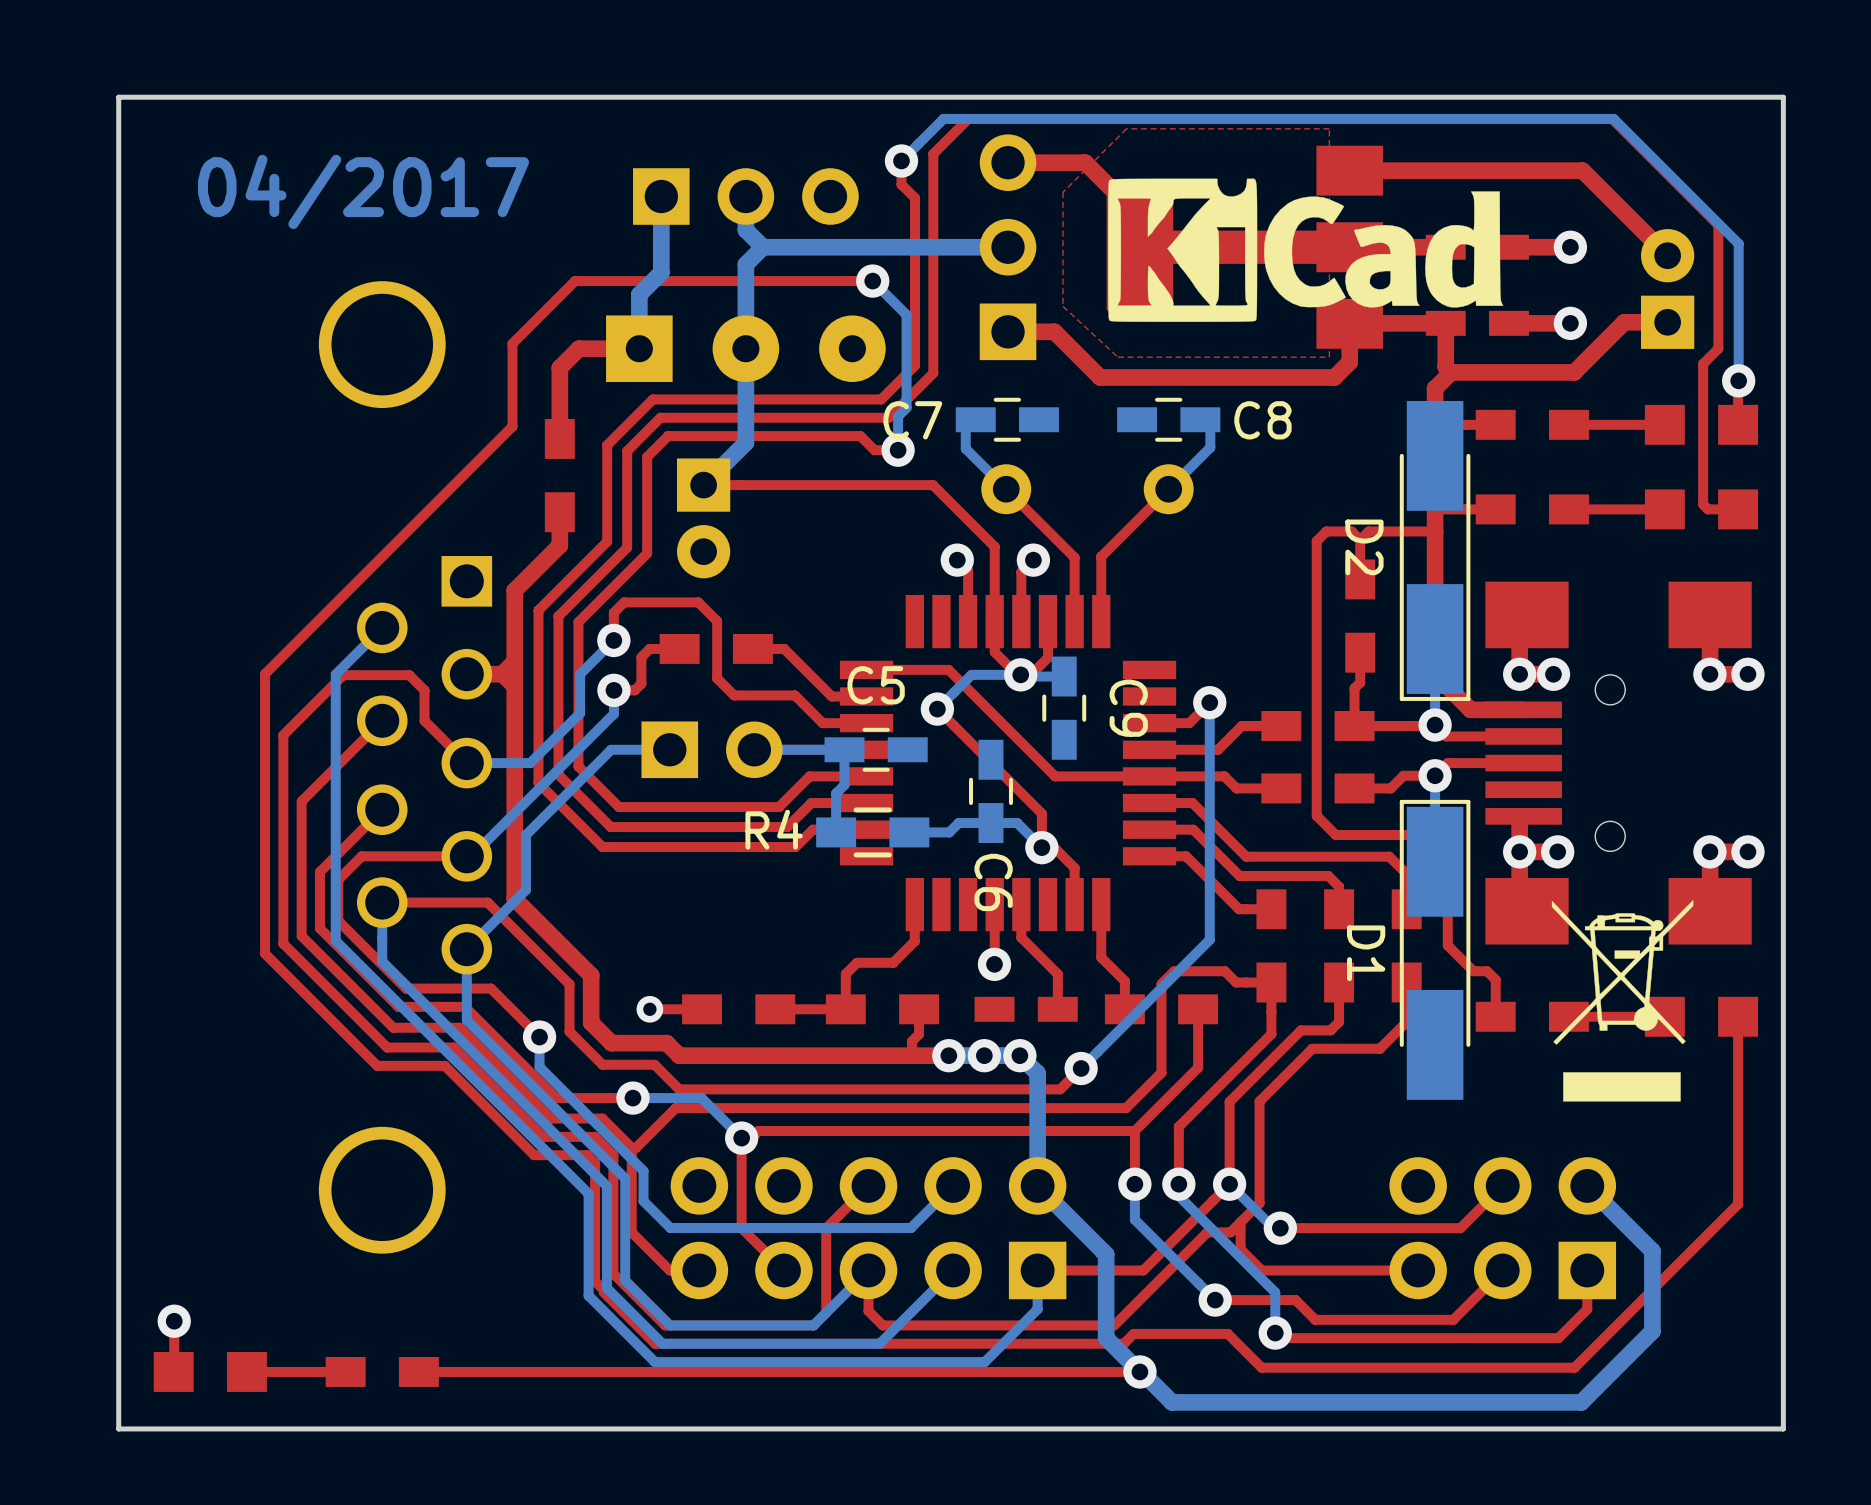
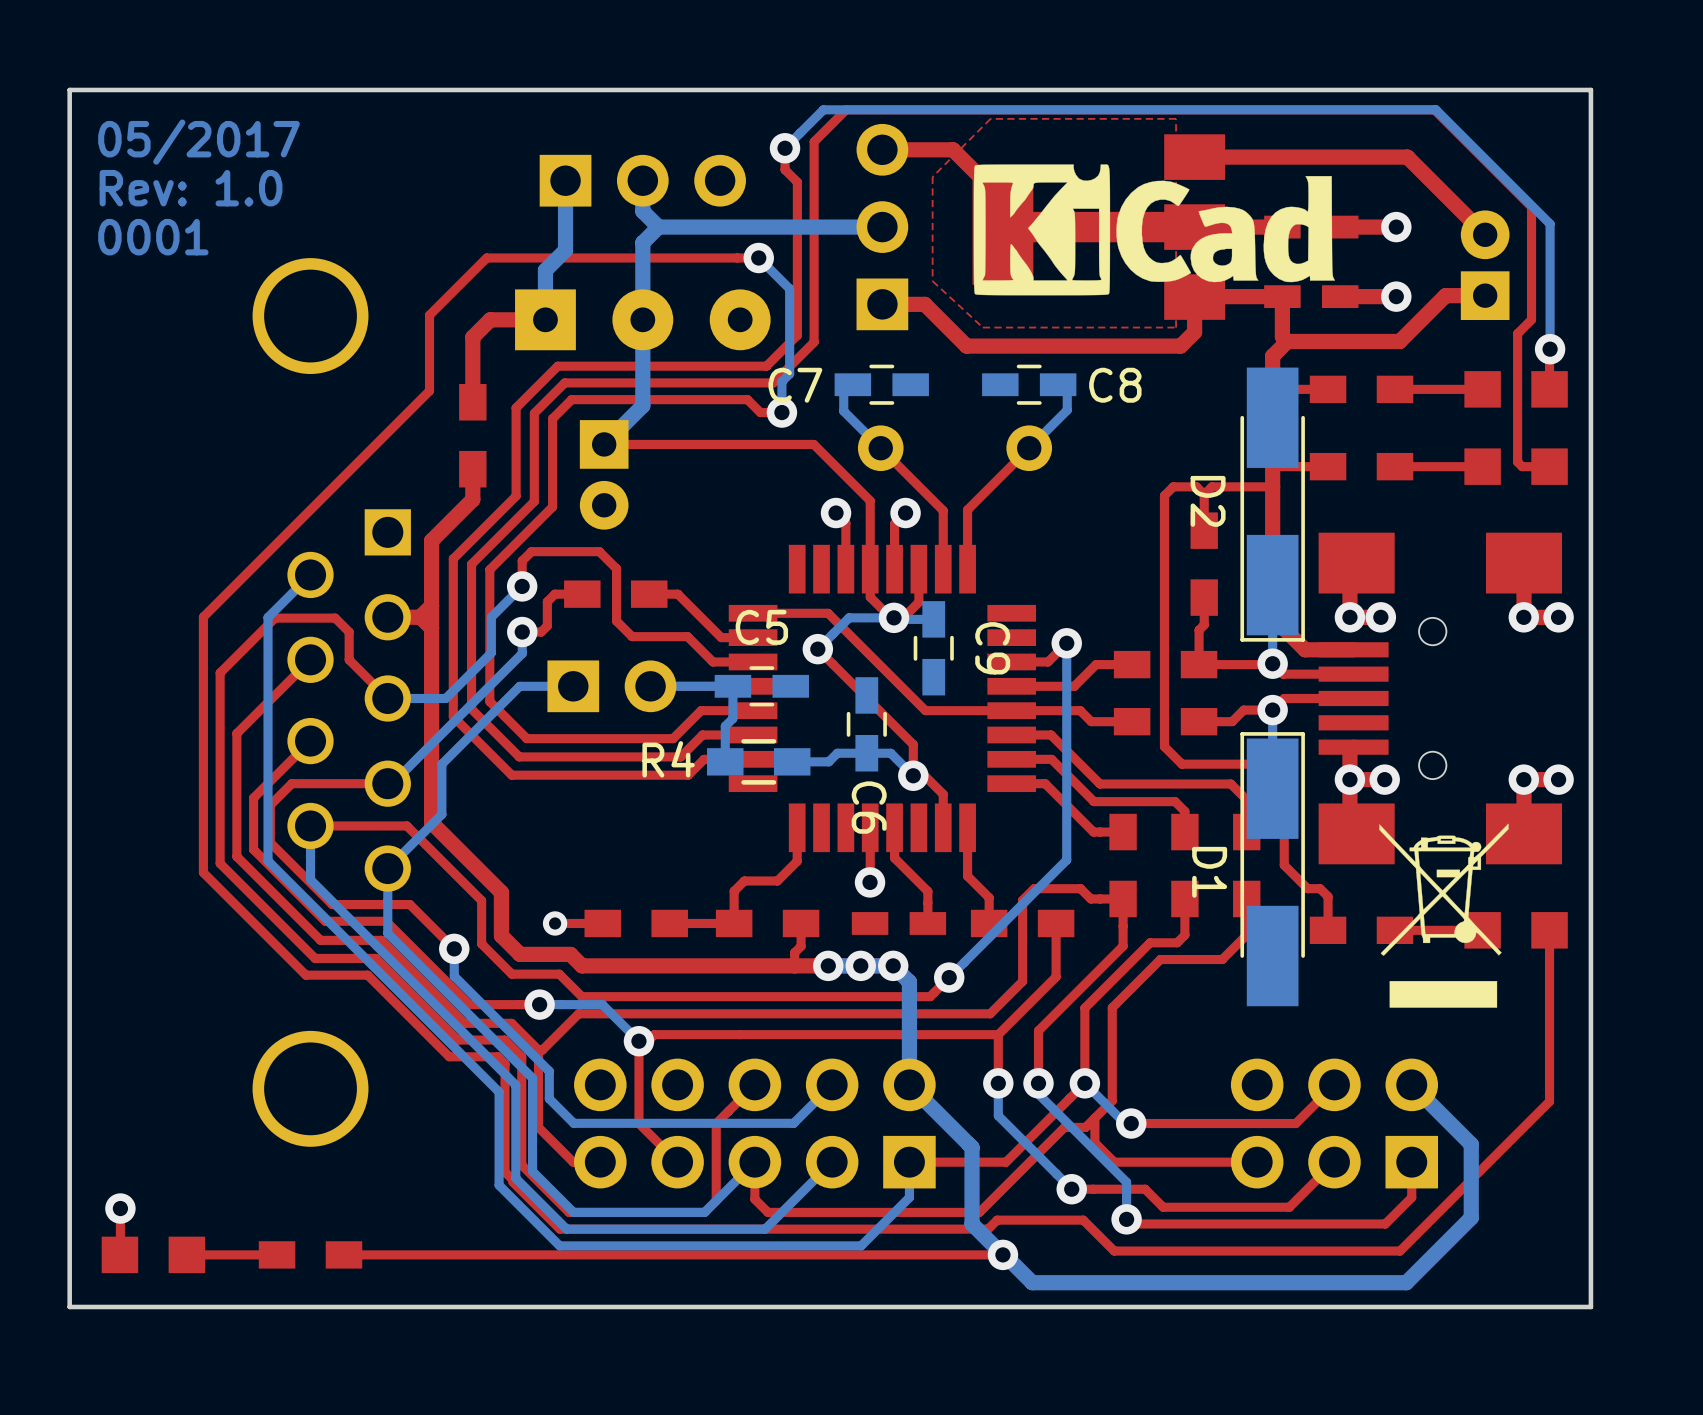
text: 04/2017 (363, 191) -> 05/2017 (198, 142)
text: none -> Rev: 1.0 (191, 188)
text: none -> 0001 (153, 237)

